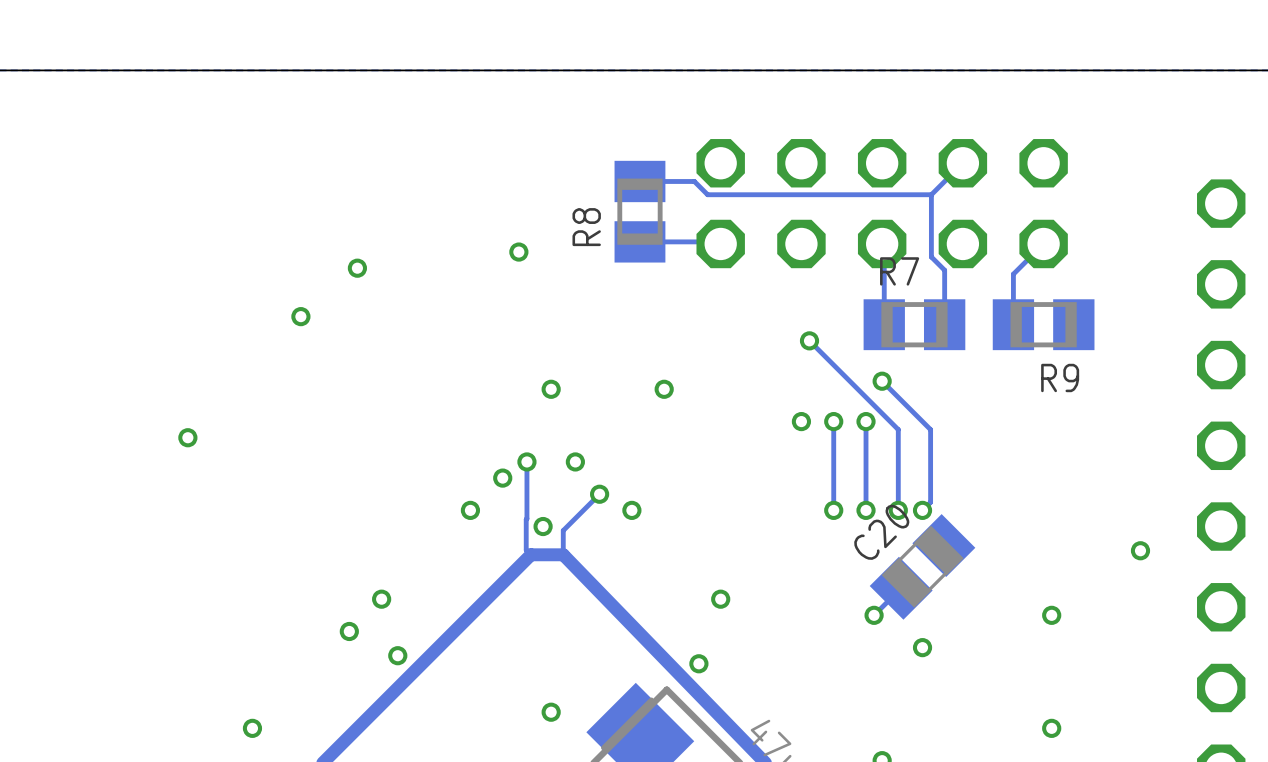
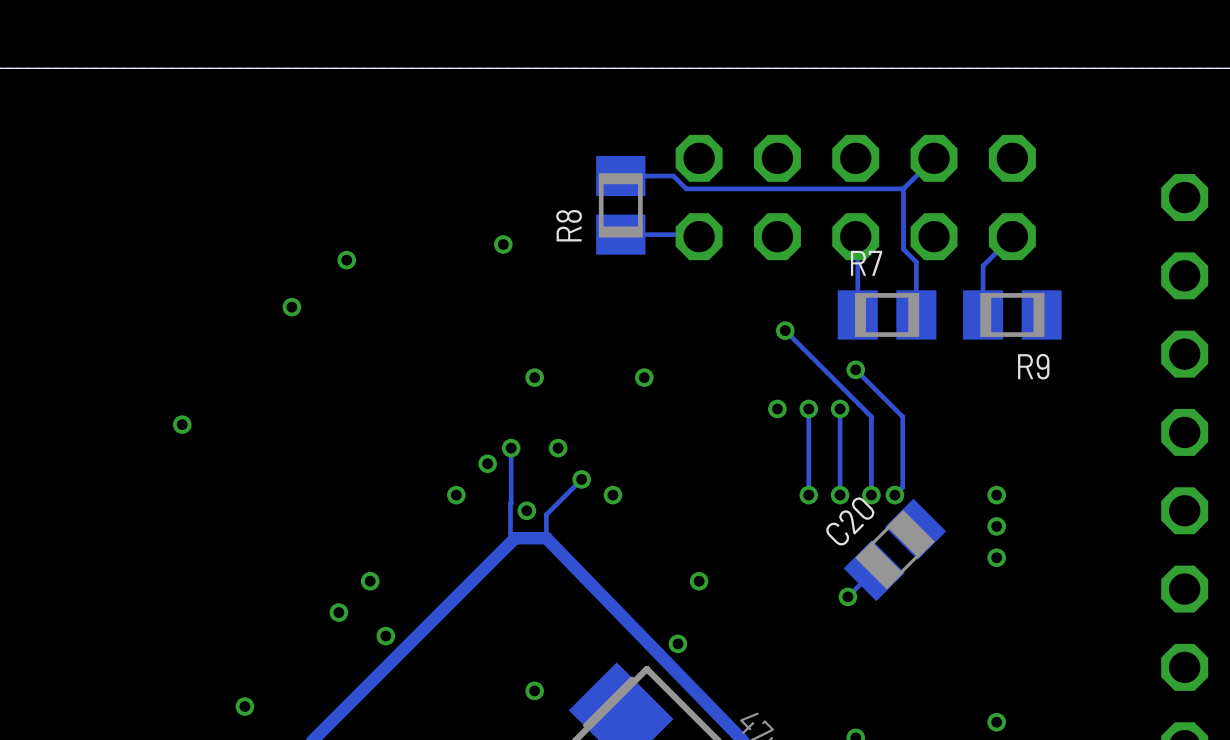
via: none -> (996, 495)
via: none -> (996, 526)
via: (1140, 550) -> none
via: none -> (996, 557)
via: (1051, 615) -> none
via: (922, 647) -> none
via: (1051, 728) -> none
via: none -> (996, 722)

